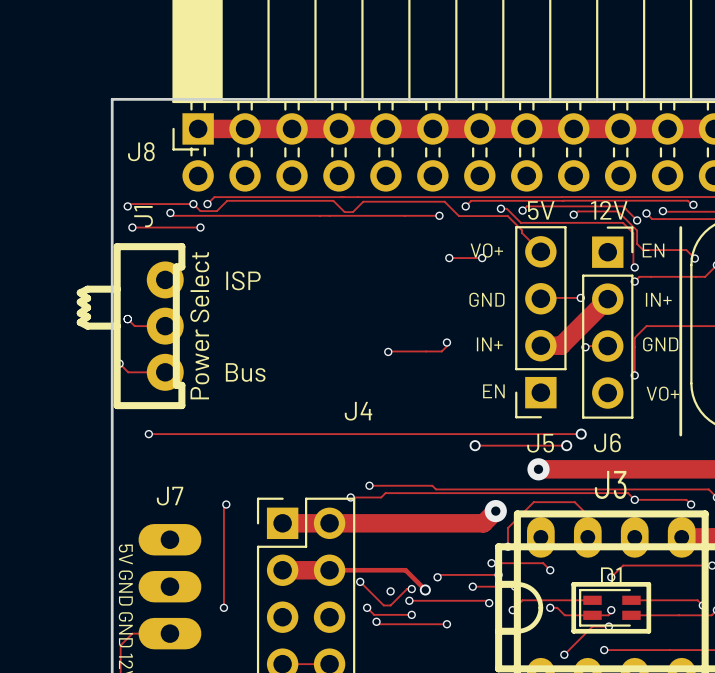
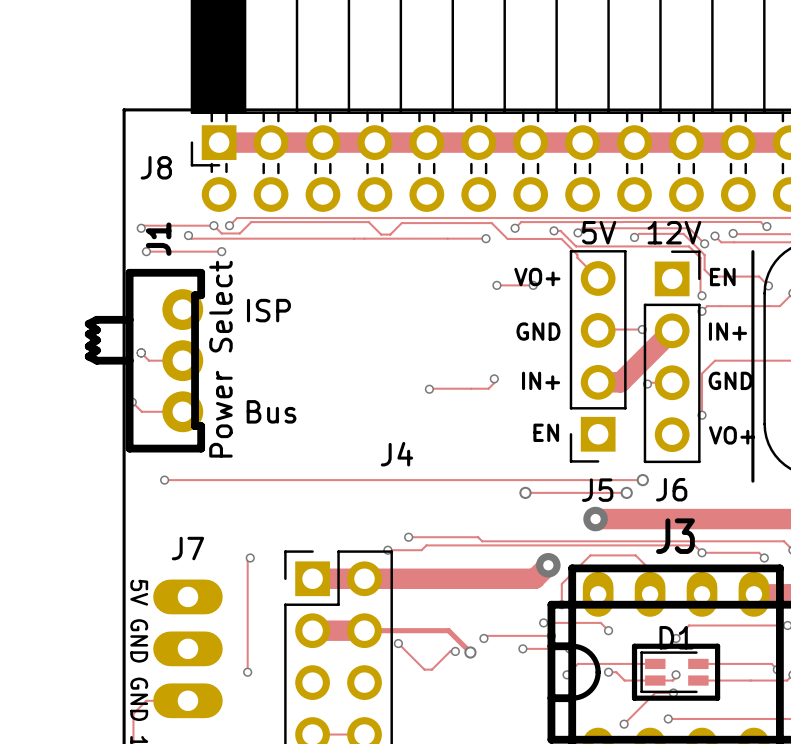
via: (390, 591) -> none
track: (409, 600) (486, 600) (489, 603) -> none
via: (409, 600) -> none
via: (489, 603) -> none
track: (367, 607) (374, 614) (411, 614) -> none
via: (367, 607) -> none
via: (411, 614) -> none
track: (376, 621) (378, 624) (446, 624) -> none
via: (376, 621) -> none
via: (446, 624) -> none

